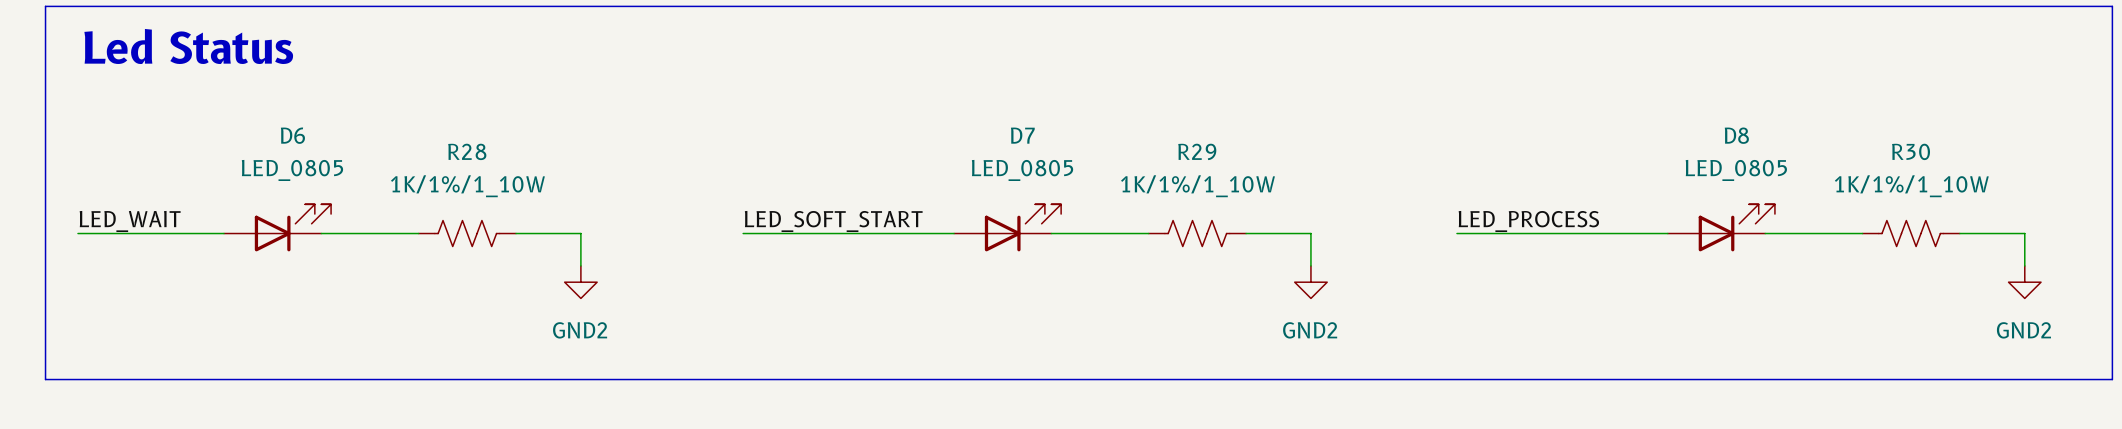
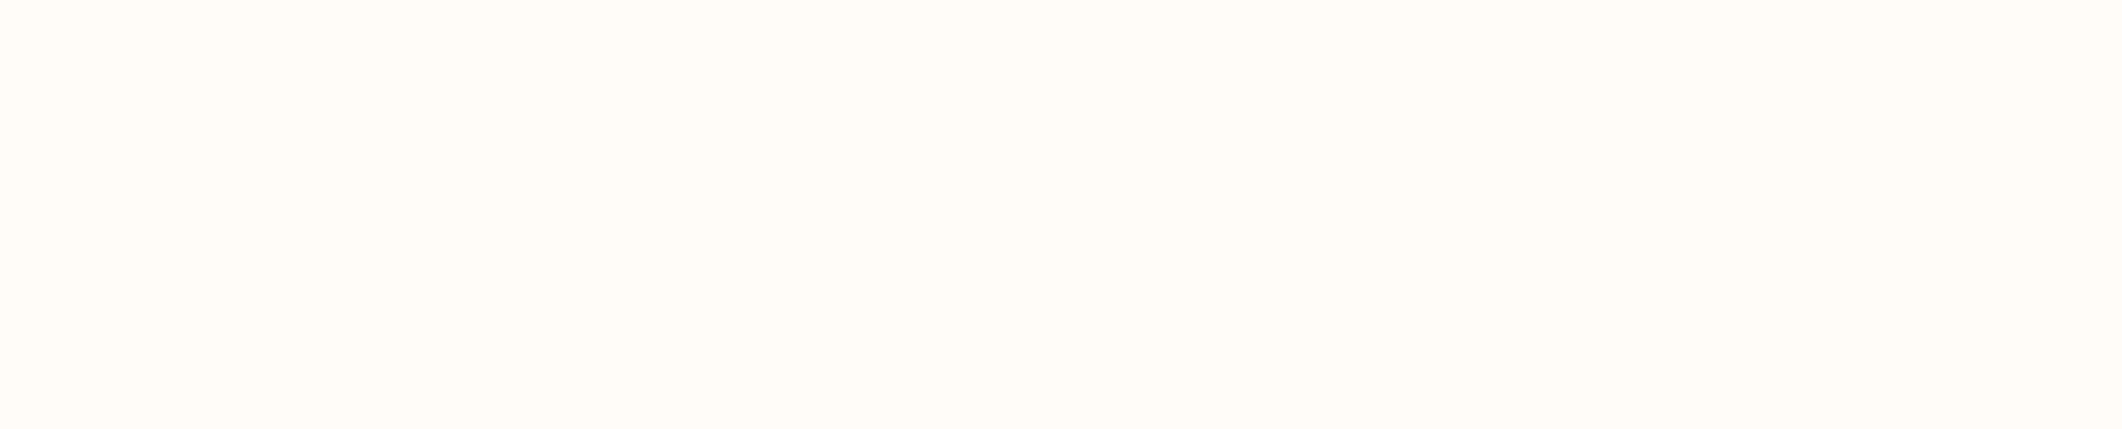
line: (45, 6) (2112, 6) (2112, 379) (45, 379) (45, 6) -> none
text: Led Status (188, 46) -> none
label: LED_WAIT (130, 221) -> none
label: LED_SOFT_START (833, 221) -> none
label: LED_PROCESS (1528, 221) -> none
D6: LED_0805 (277, 227) -> none
D7: LED_0805 (1007, 227) -> none
D8: LED_0805 (1721, 227) -> none
wire: (77, 233) (223, 233) -> none
wire: (321, 233) (418, 233) -> none
R28: 1K/1%/1_10W (467, 233) -> none
wire: (516, 233) (580, 233) (580, 265) -> none
wire: (743, 233) (954, 233) -> none
wire: (1051, 233) (1148, 233) -> none
R29: 1K/1%/1_10W (1197, 233) -> none
wire: (1246, 233) (1310, 233) (1310, 265) -> none
wire: (1456, 233) (1667, 233) -> none
wire: (1765, 233) (1862, 233) -> none
R30: 1K/1%/1_10W (1911, 233) -> none
wire: (1959, 233) (2024, 233) (2024, 265) -> none
power symbol: GND2 (580, 282) -> none
power symbol: GND2 (1310, 282) -> none
power symbol: GND2 (2024, 282) -> none

